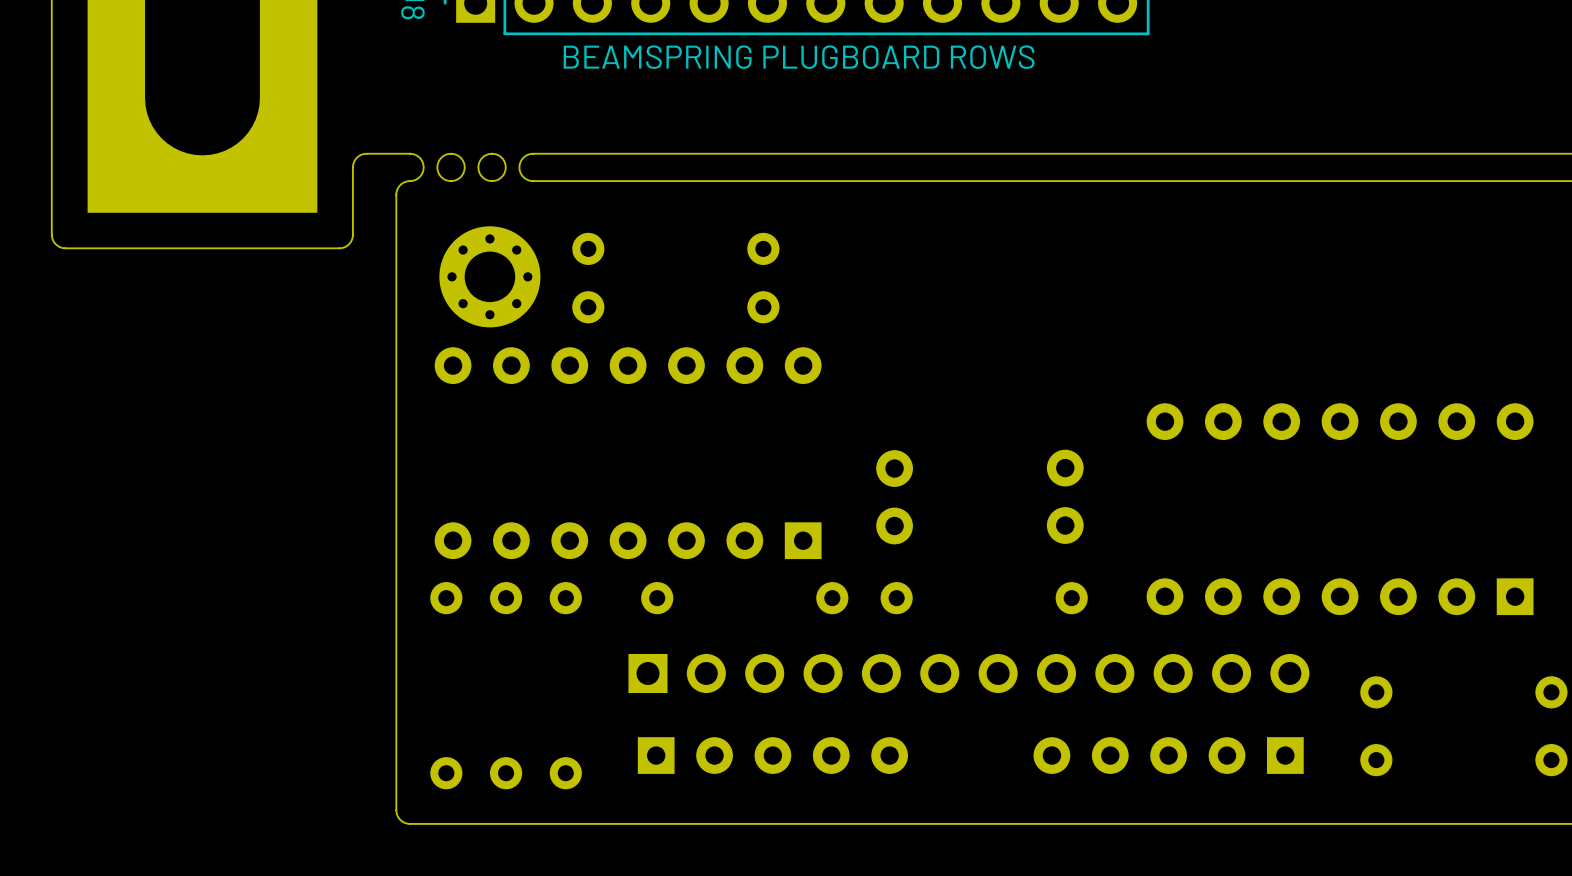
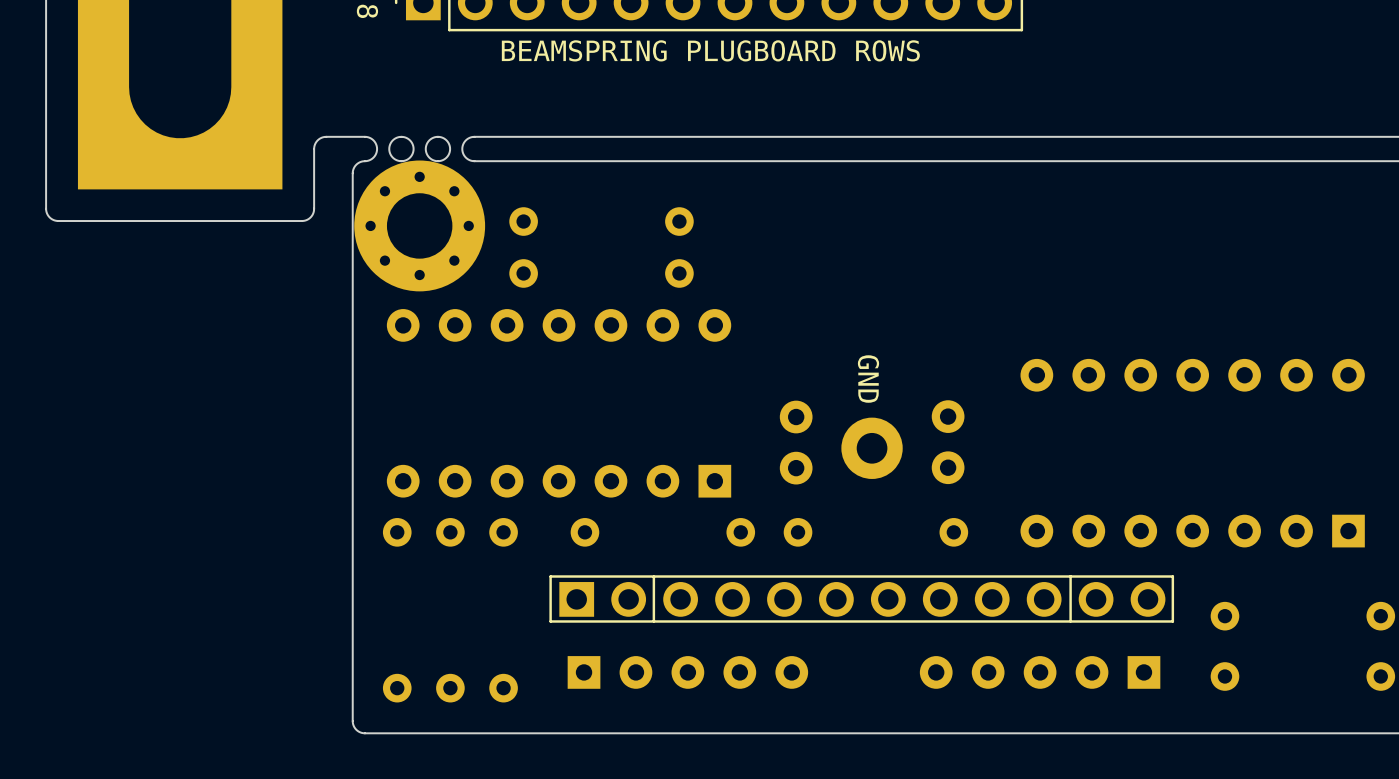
part: none -> (419, 225)
part: (489, 276) -> none
text: none -> GND (868, 379)
part: none -> (872, 448)
line: none -> (653, 576) (653, 621)
line: none -> (1070, 576) (1070, 621)
line: none -> (1172, 576) (1172, 621) (550, 621) (550, 576) (1172, 576)

